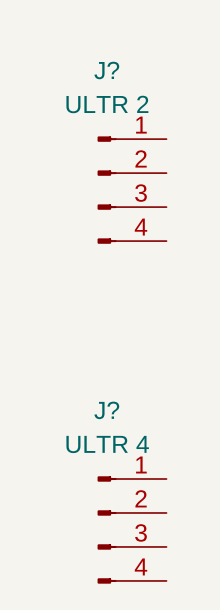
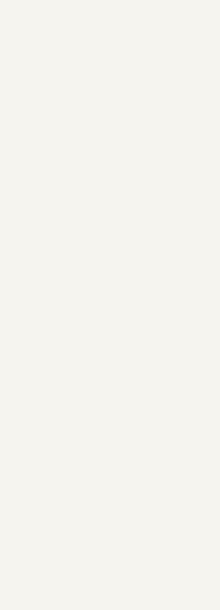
J?: ULTR 2 (132, 190) -> none
J?: ULTR 4 (132, 529) -> none

